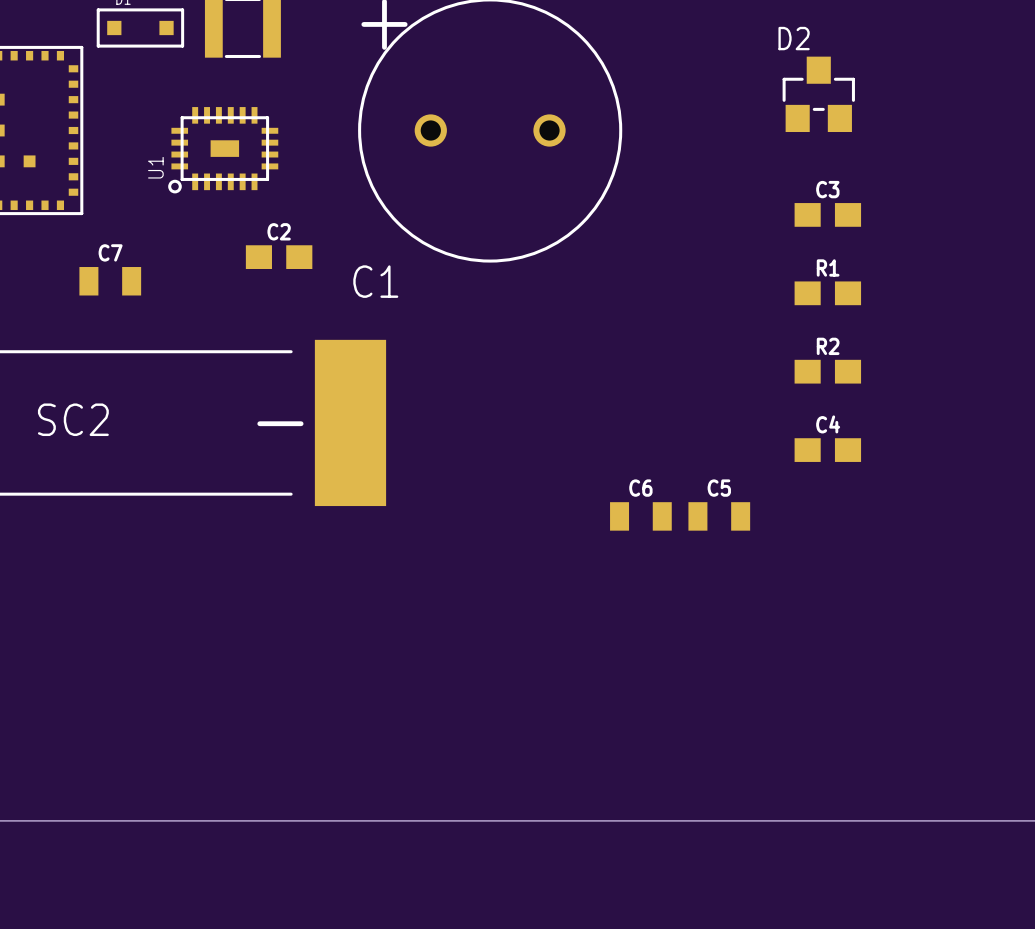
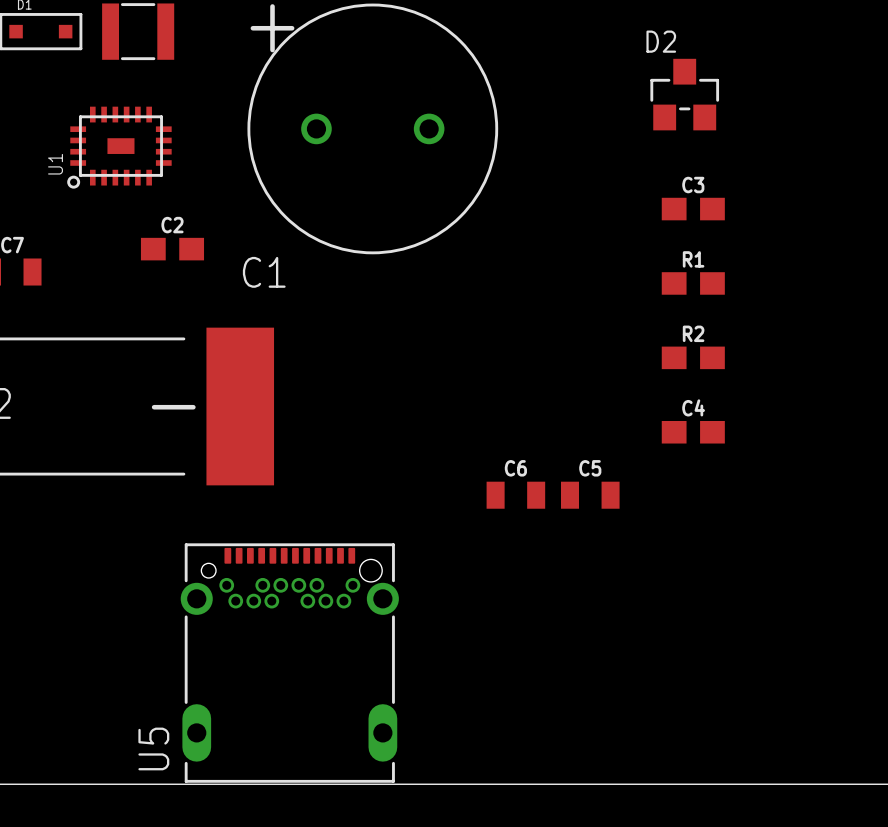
U5: none -> (289, 663)

